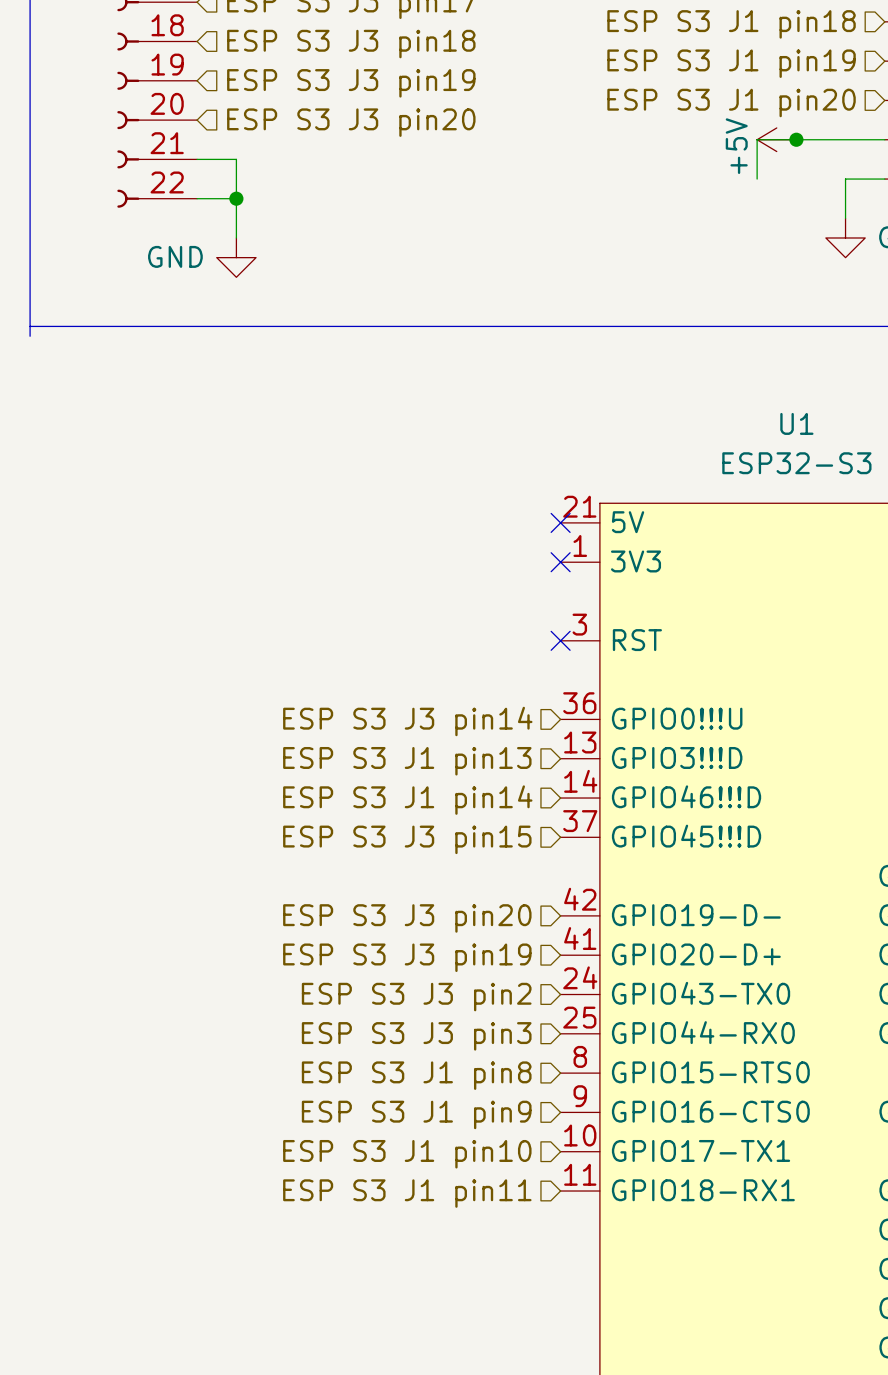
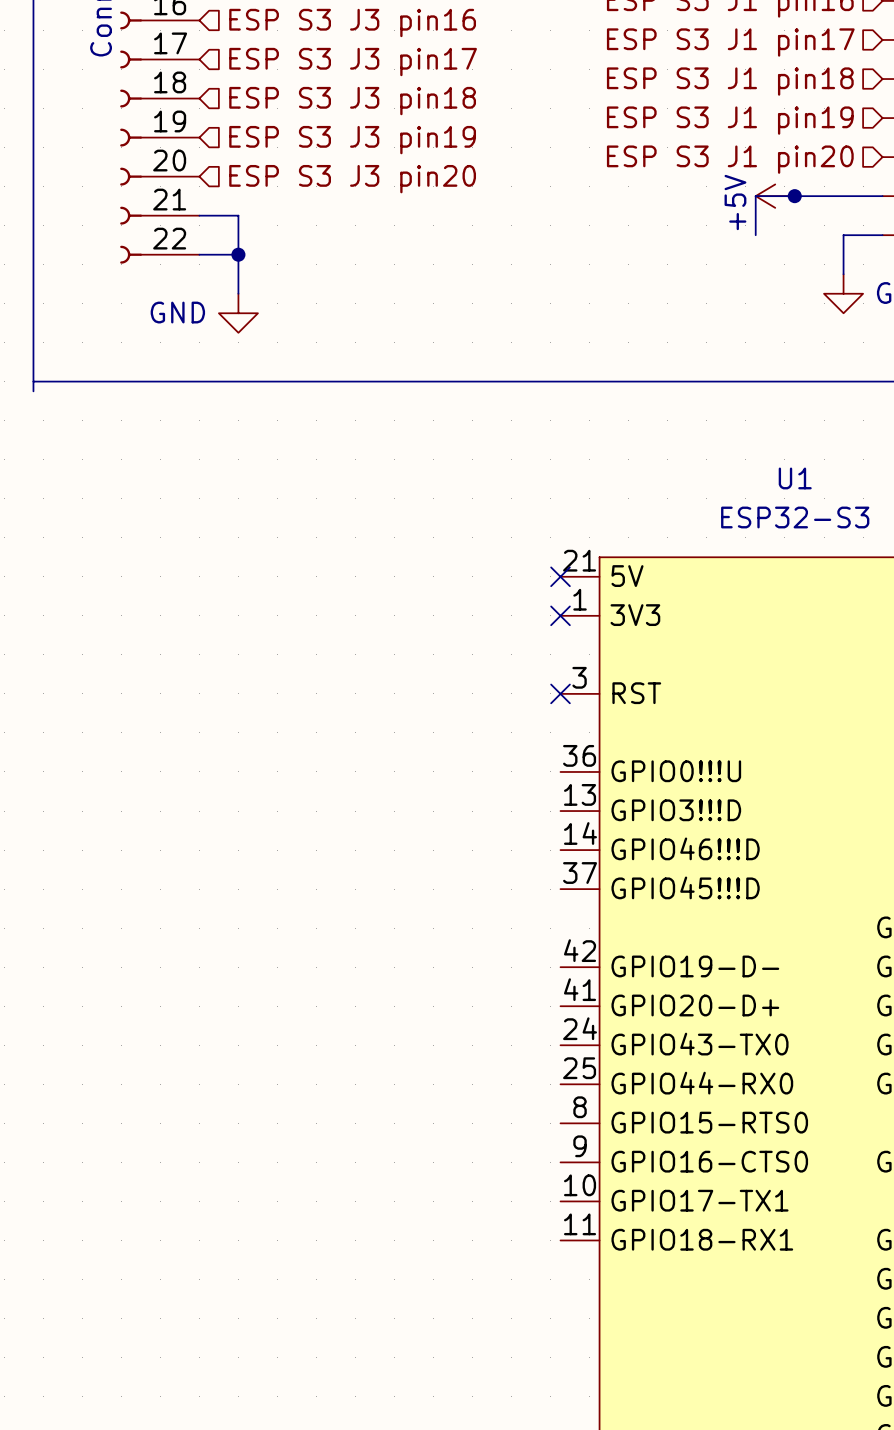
hierarchical label: ESP S3 J3 pin14 (407, 721) -> none
hierarchical label: ESP S3 J1 pin13 (407, 761) -> none
hierarchical label: ESP S3 J1 pin14 (407, 800) -> none
hierarchical label: ESP S3 J3 pin15 (407, 839) -> none
hierarchical label: ESP S3 J3 pin20 (407, 918) -> none
hierarchical label: ESP S3 J3 pin19 (407, 957) -> none
hierarchical label: ESP S3 J3 pin2 (416, 997) -> none
hierarchical label: ESP S3 J3 pin3 (416, 1036) -> none
hierarchical label: ESP S3 J1 pin8 (416, 1075) -> none
hierarchical label: ESP S3 J1 pin9 (416, 1114) -> none
hierarchical label: ESP S3 J1 pin10 (407, 1154) -> none
hierarchical label: ESP S3 J1 pin11 (407, 1193) -> none

